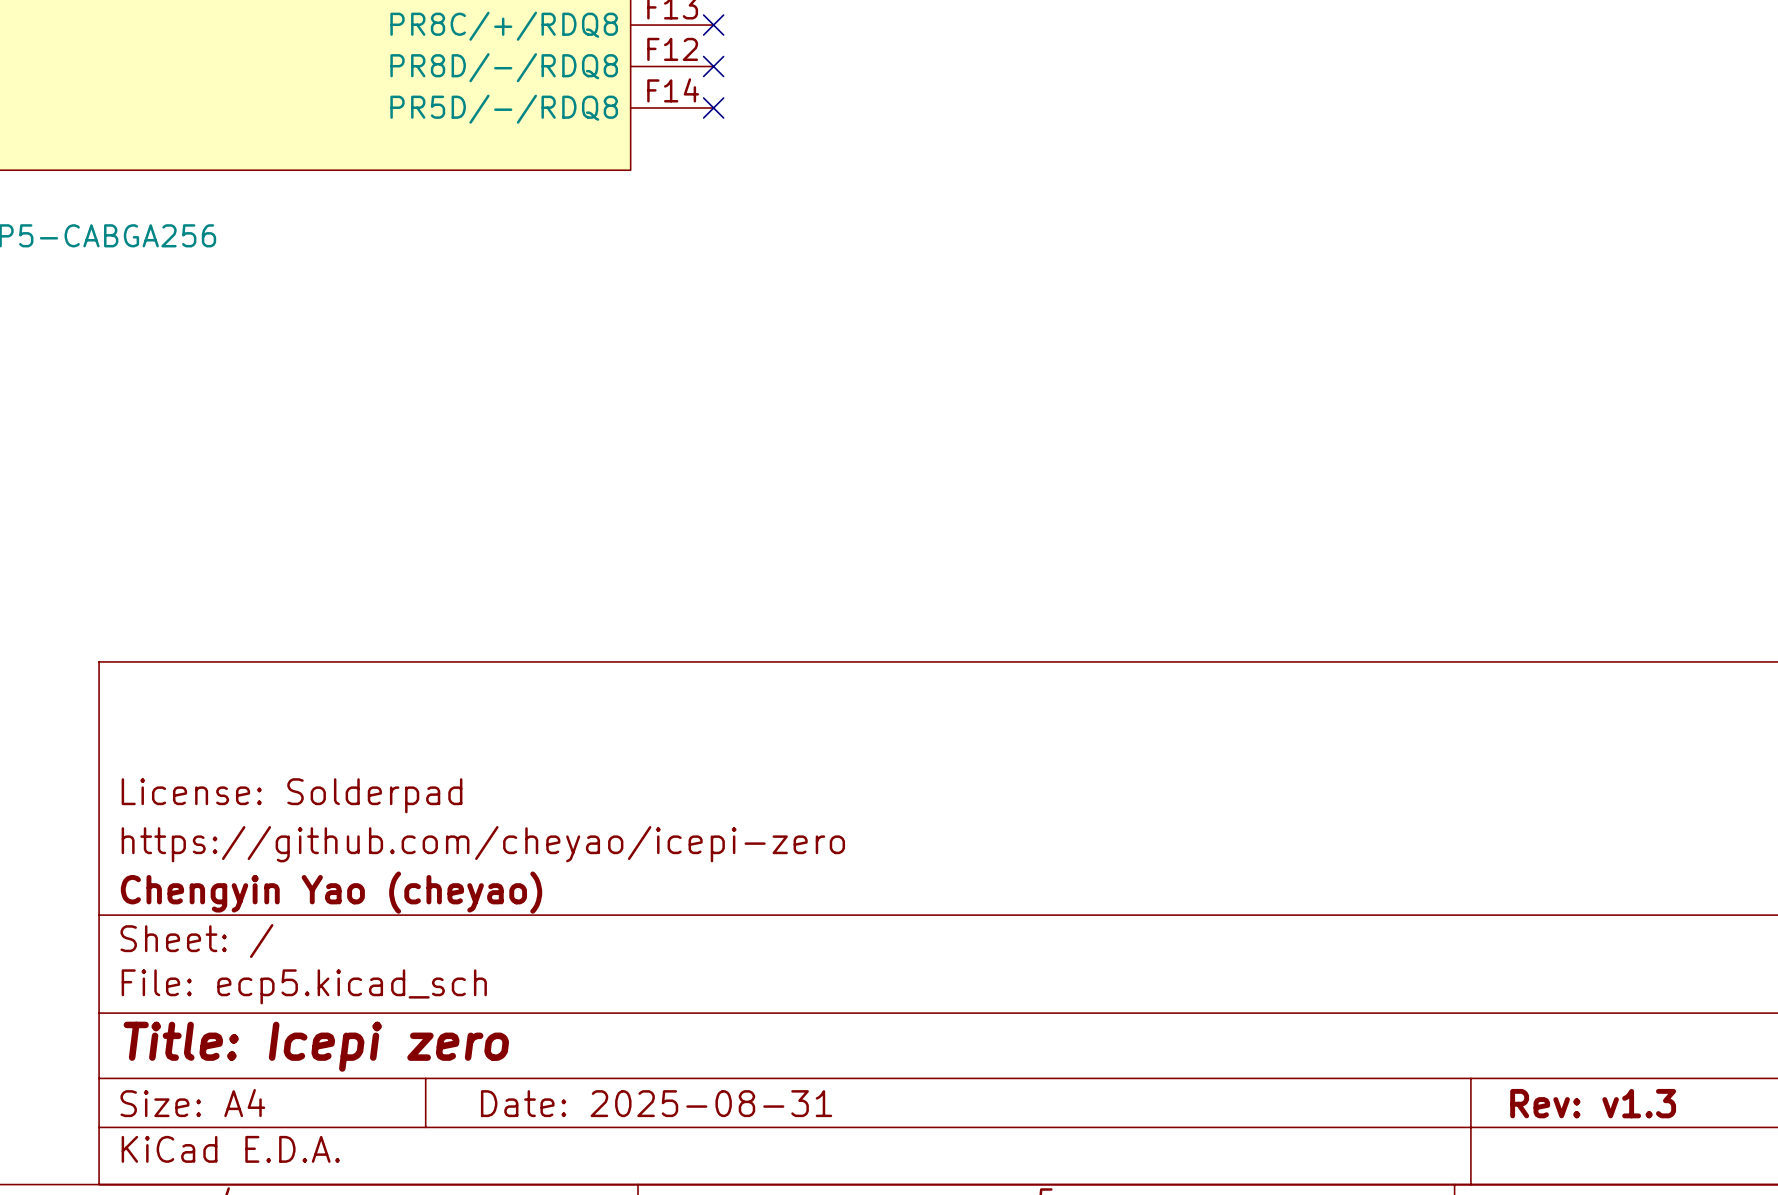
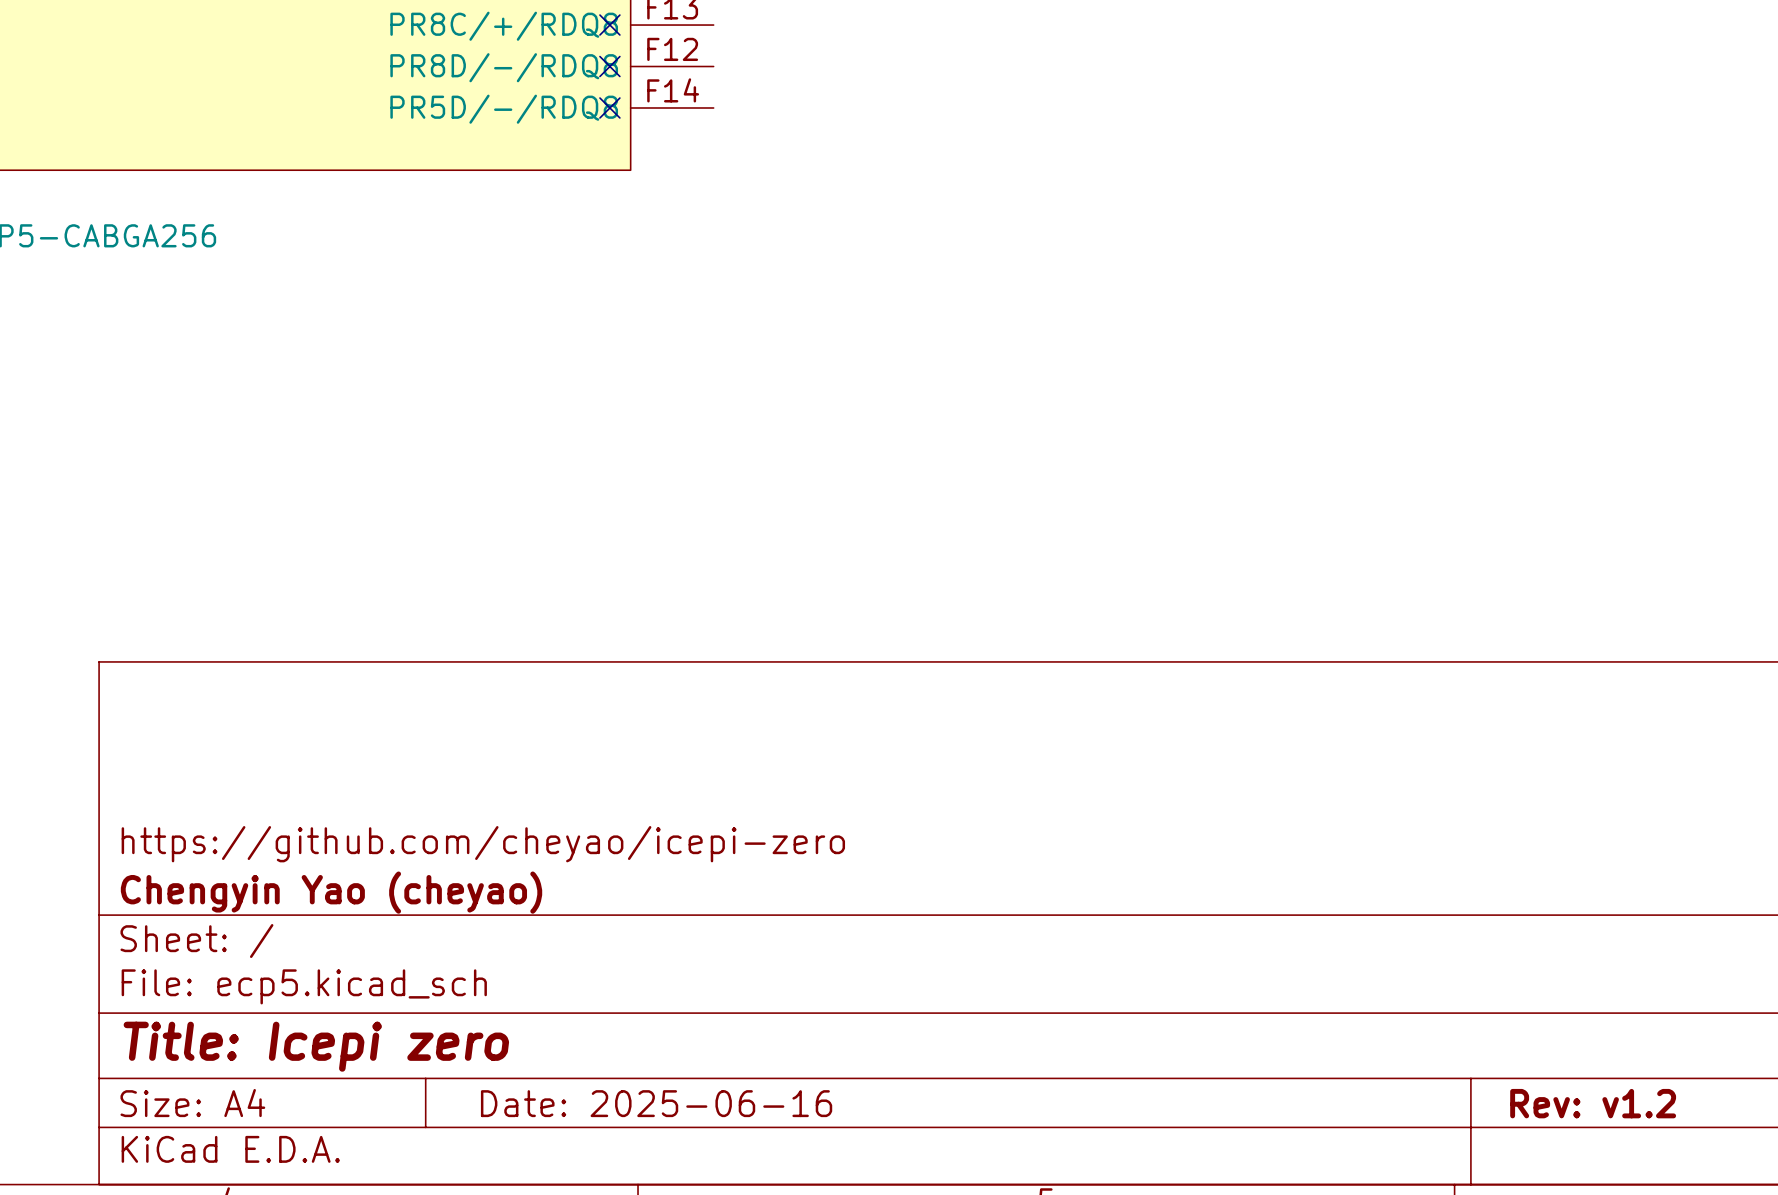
no-connect mark: none -> (609, 25)
no-connect mark: (713, 25) -> none
no-connect mark: none -> (609, 66)
no-connect mark: (713, 66) -> none
no-connect mark: none -> (609, 107)
no-connect mark: (713, 107) -> none
title block: License: Solderpad (292, 795) -> none
title block: Date: 2025-08-31 (656, 1103) -> Date: 2025-06-16 (656, 1103)
title block: Rev: v1.3 (1593, 1103) -> Rev: v1.2 (1593, 1103)

